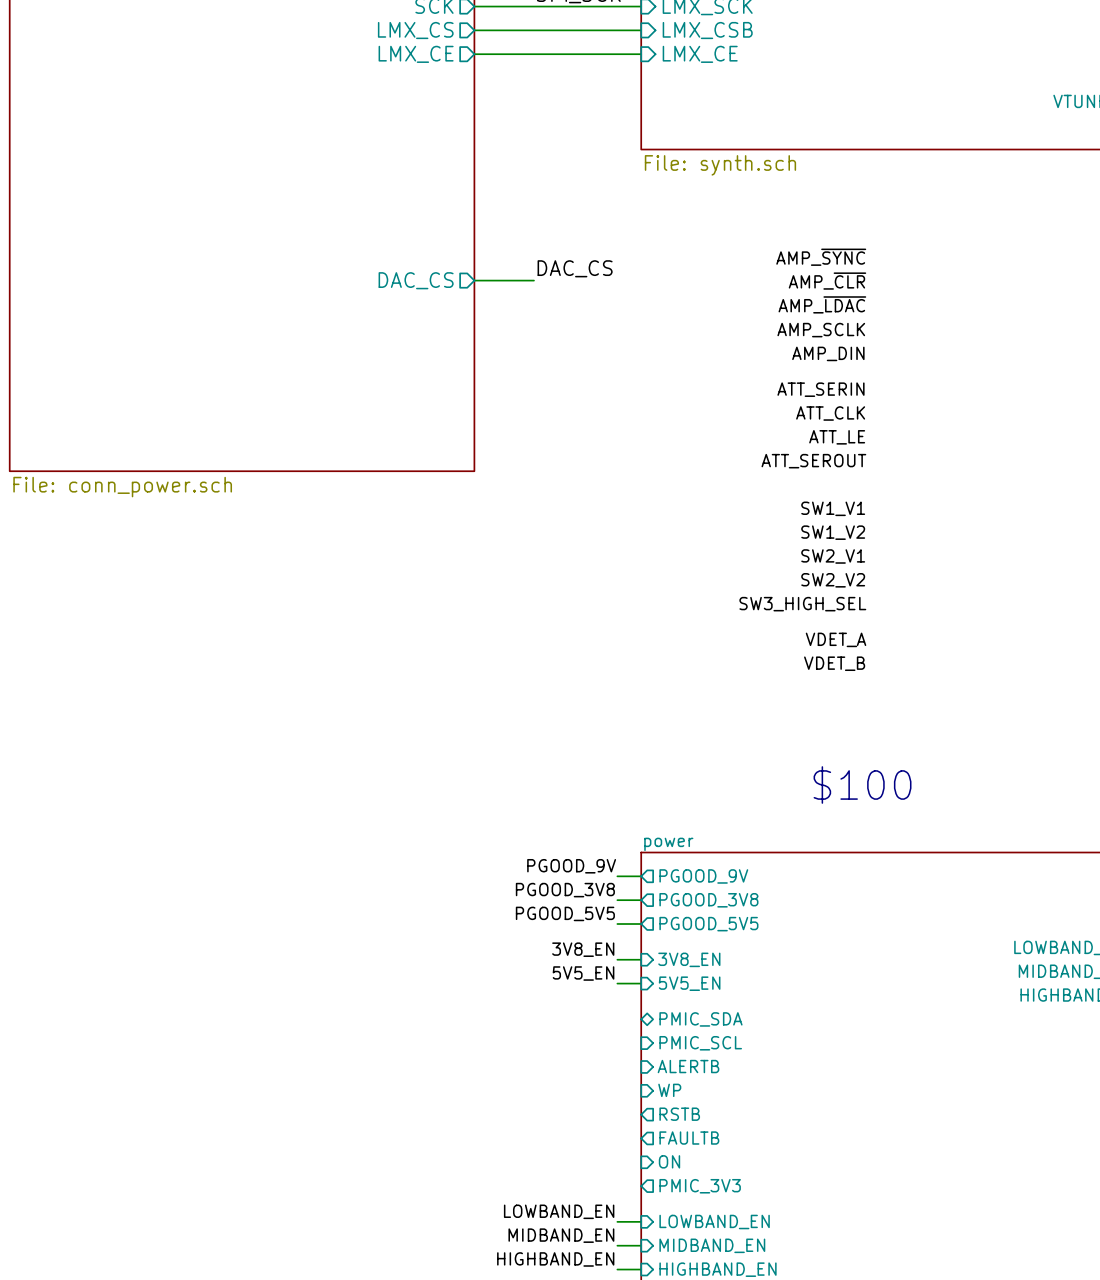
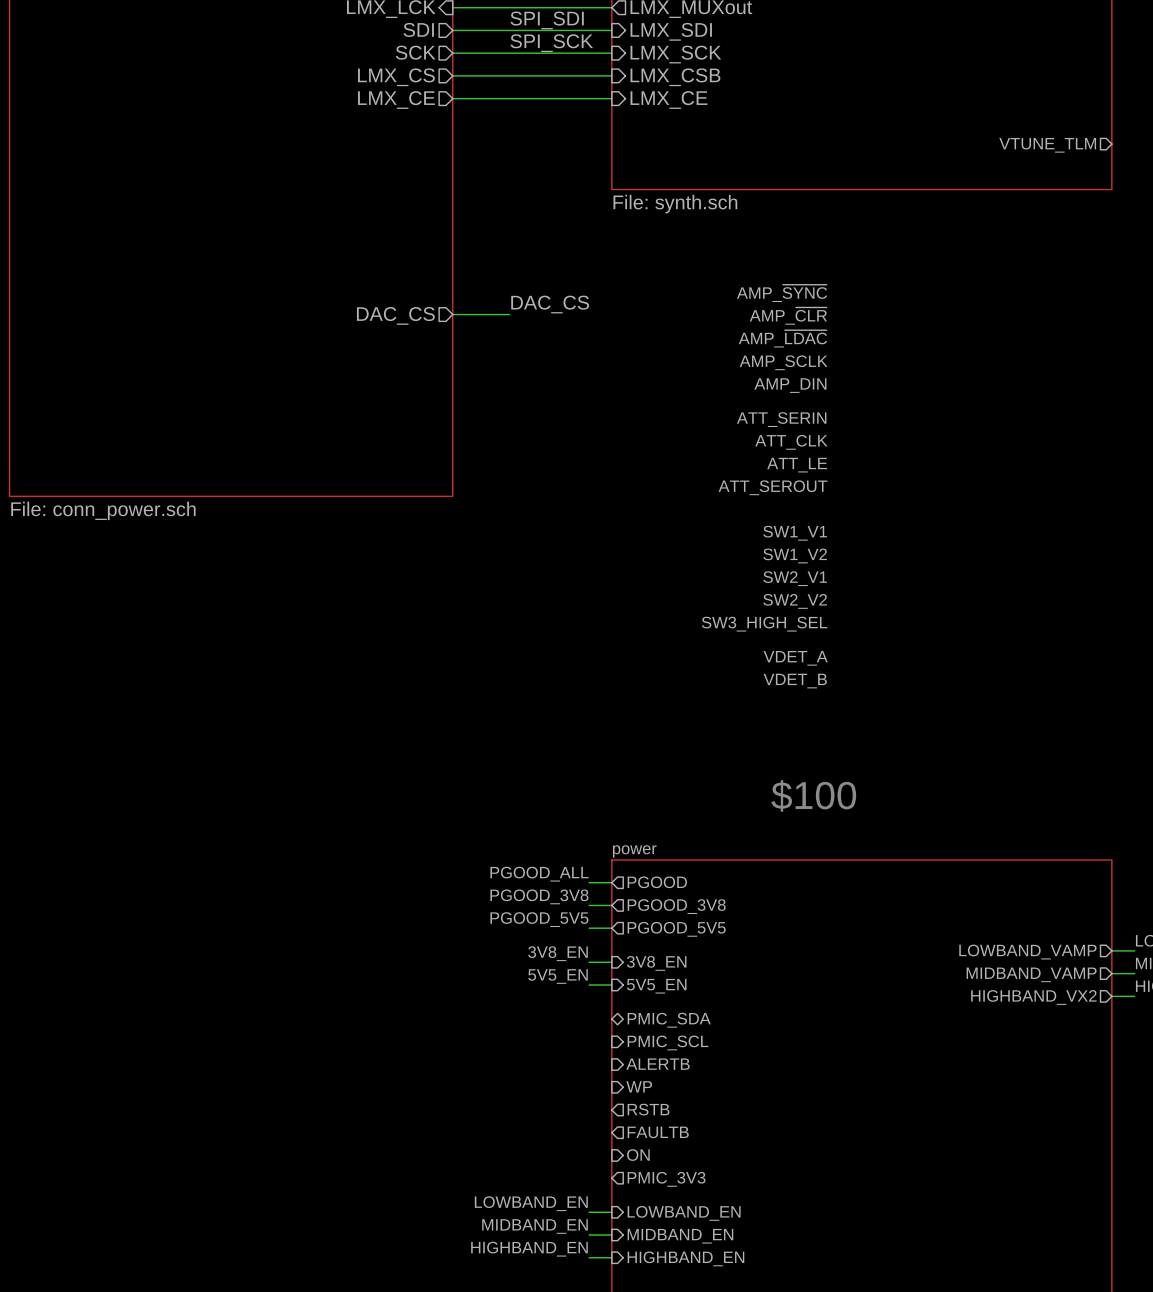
label: PGOOD_9V (571, 866) -> PGOOD_ALL (539, 874)
sheet pin: PGOOD_9V (703, 876) -> PGOOD (657, 882)

